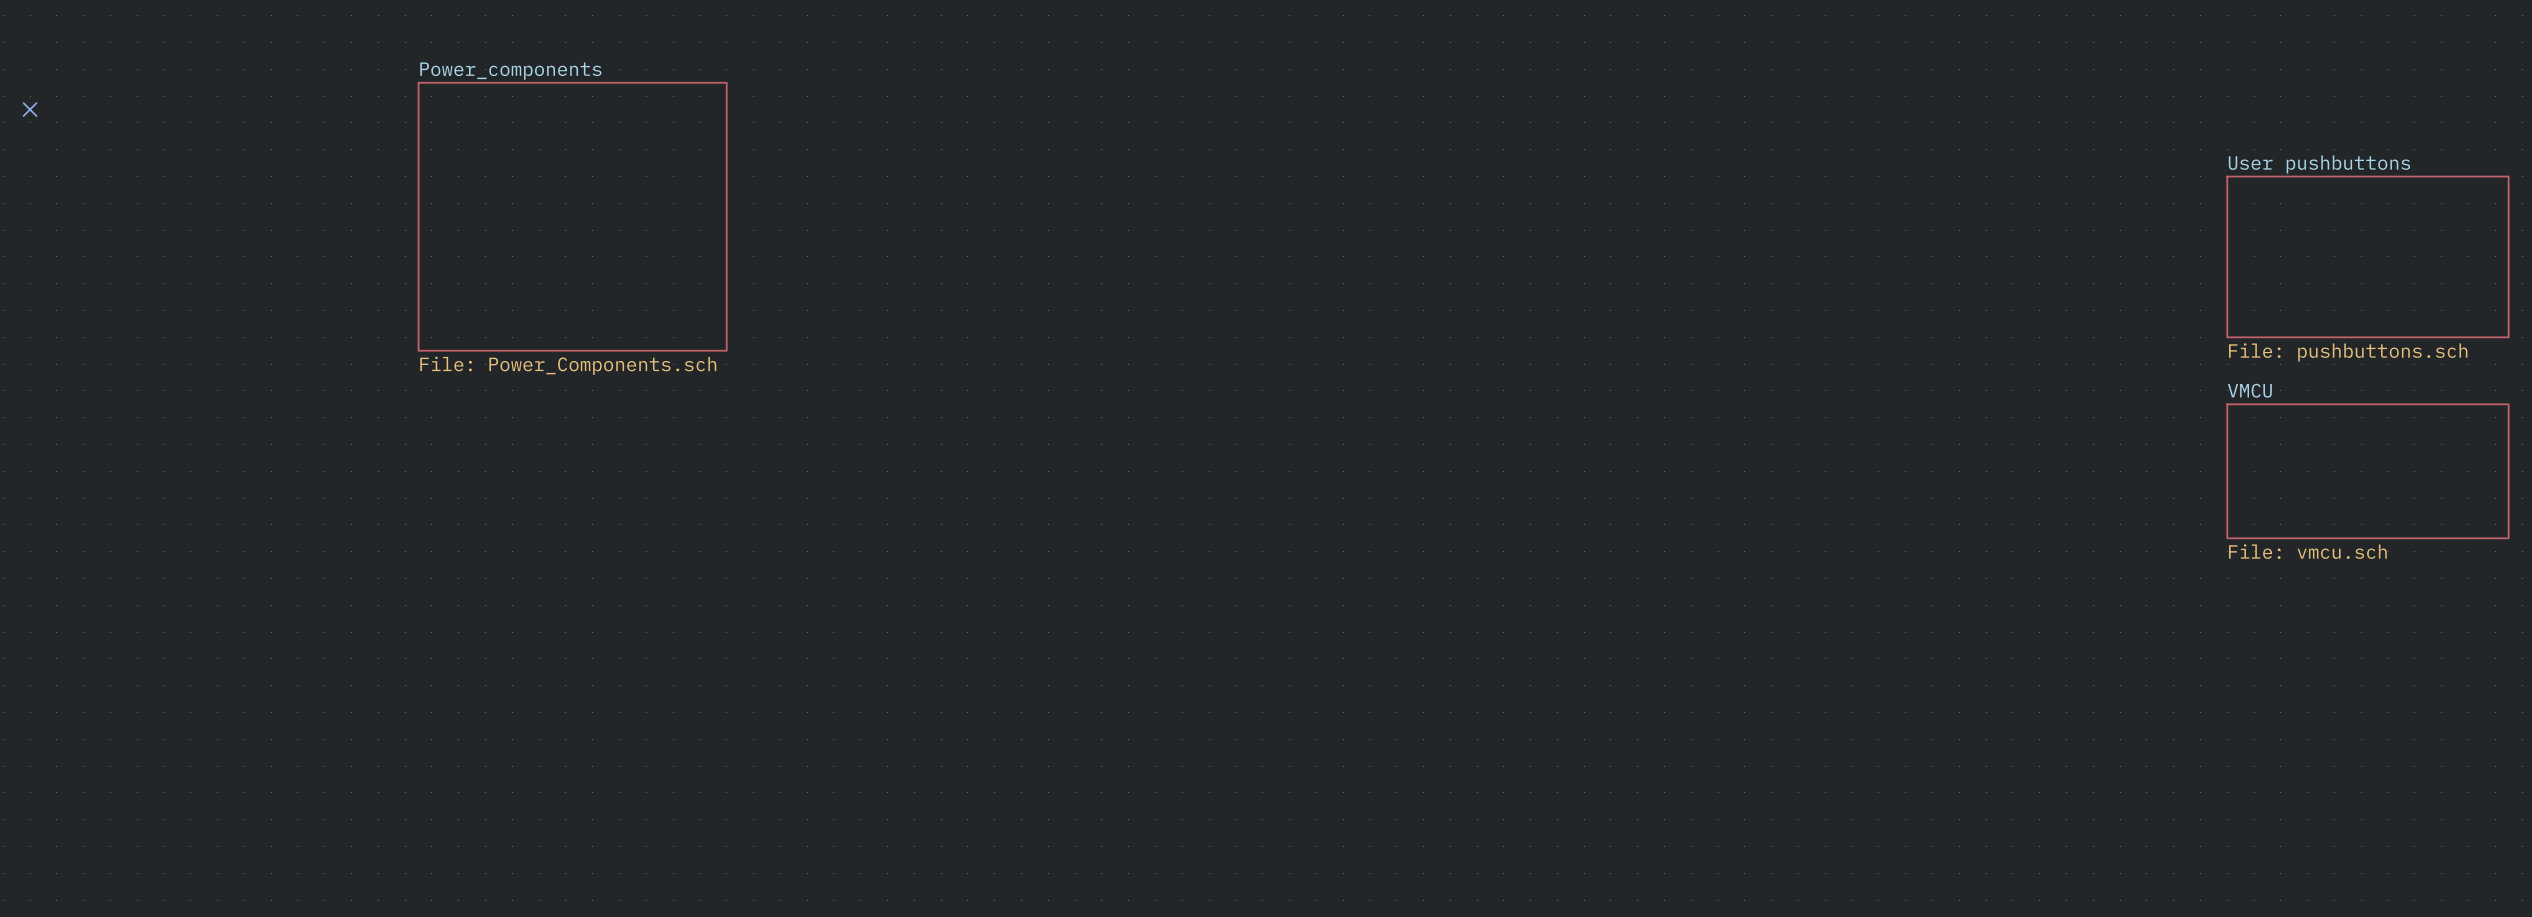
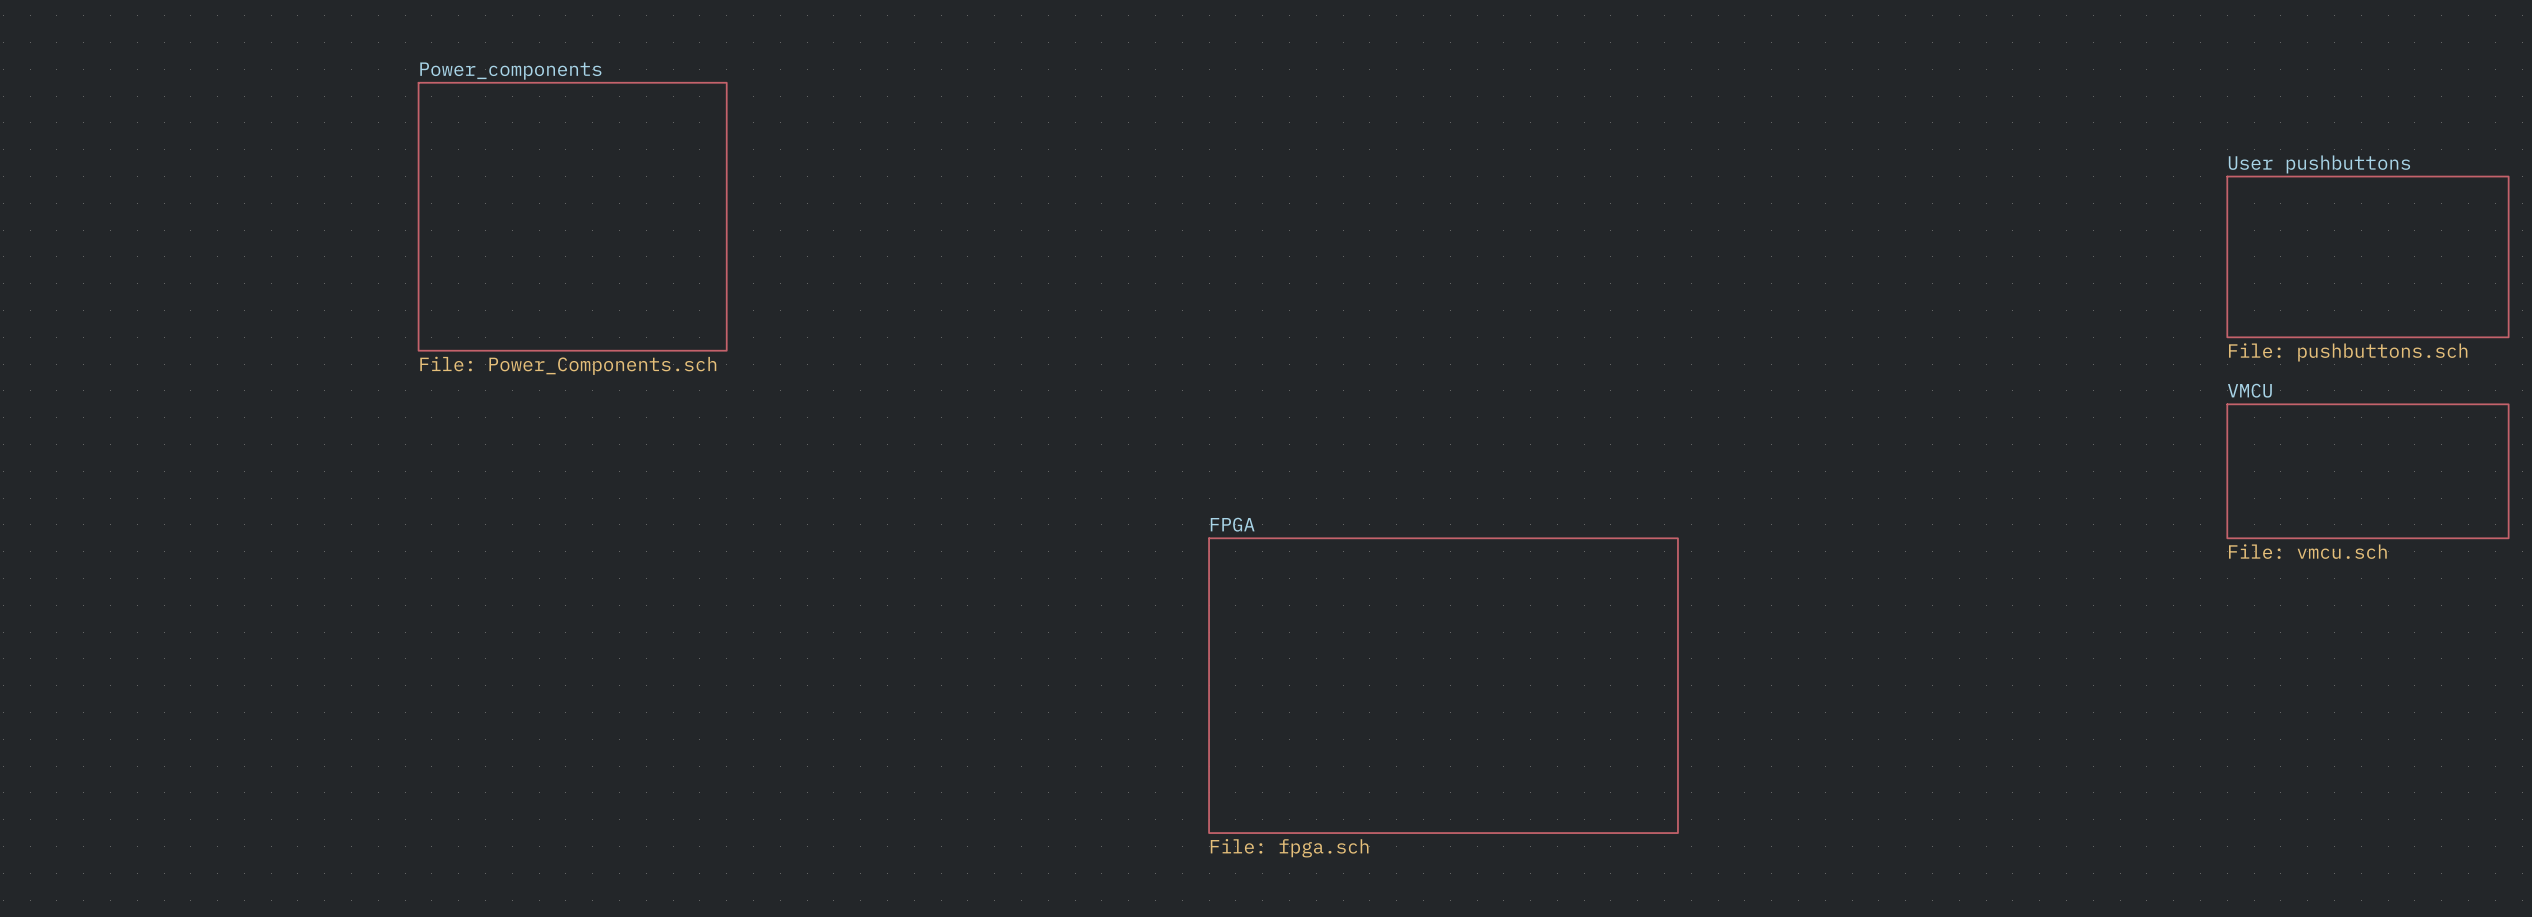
no-connect mark: (30, 109) -> none
sheet FPGA: none -> File: fpga.sch (1443, 685)

